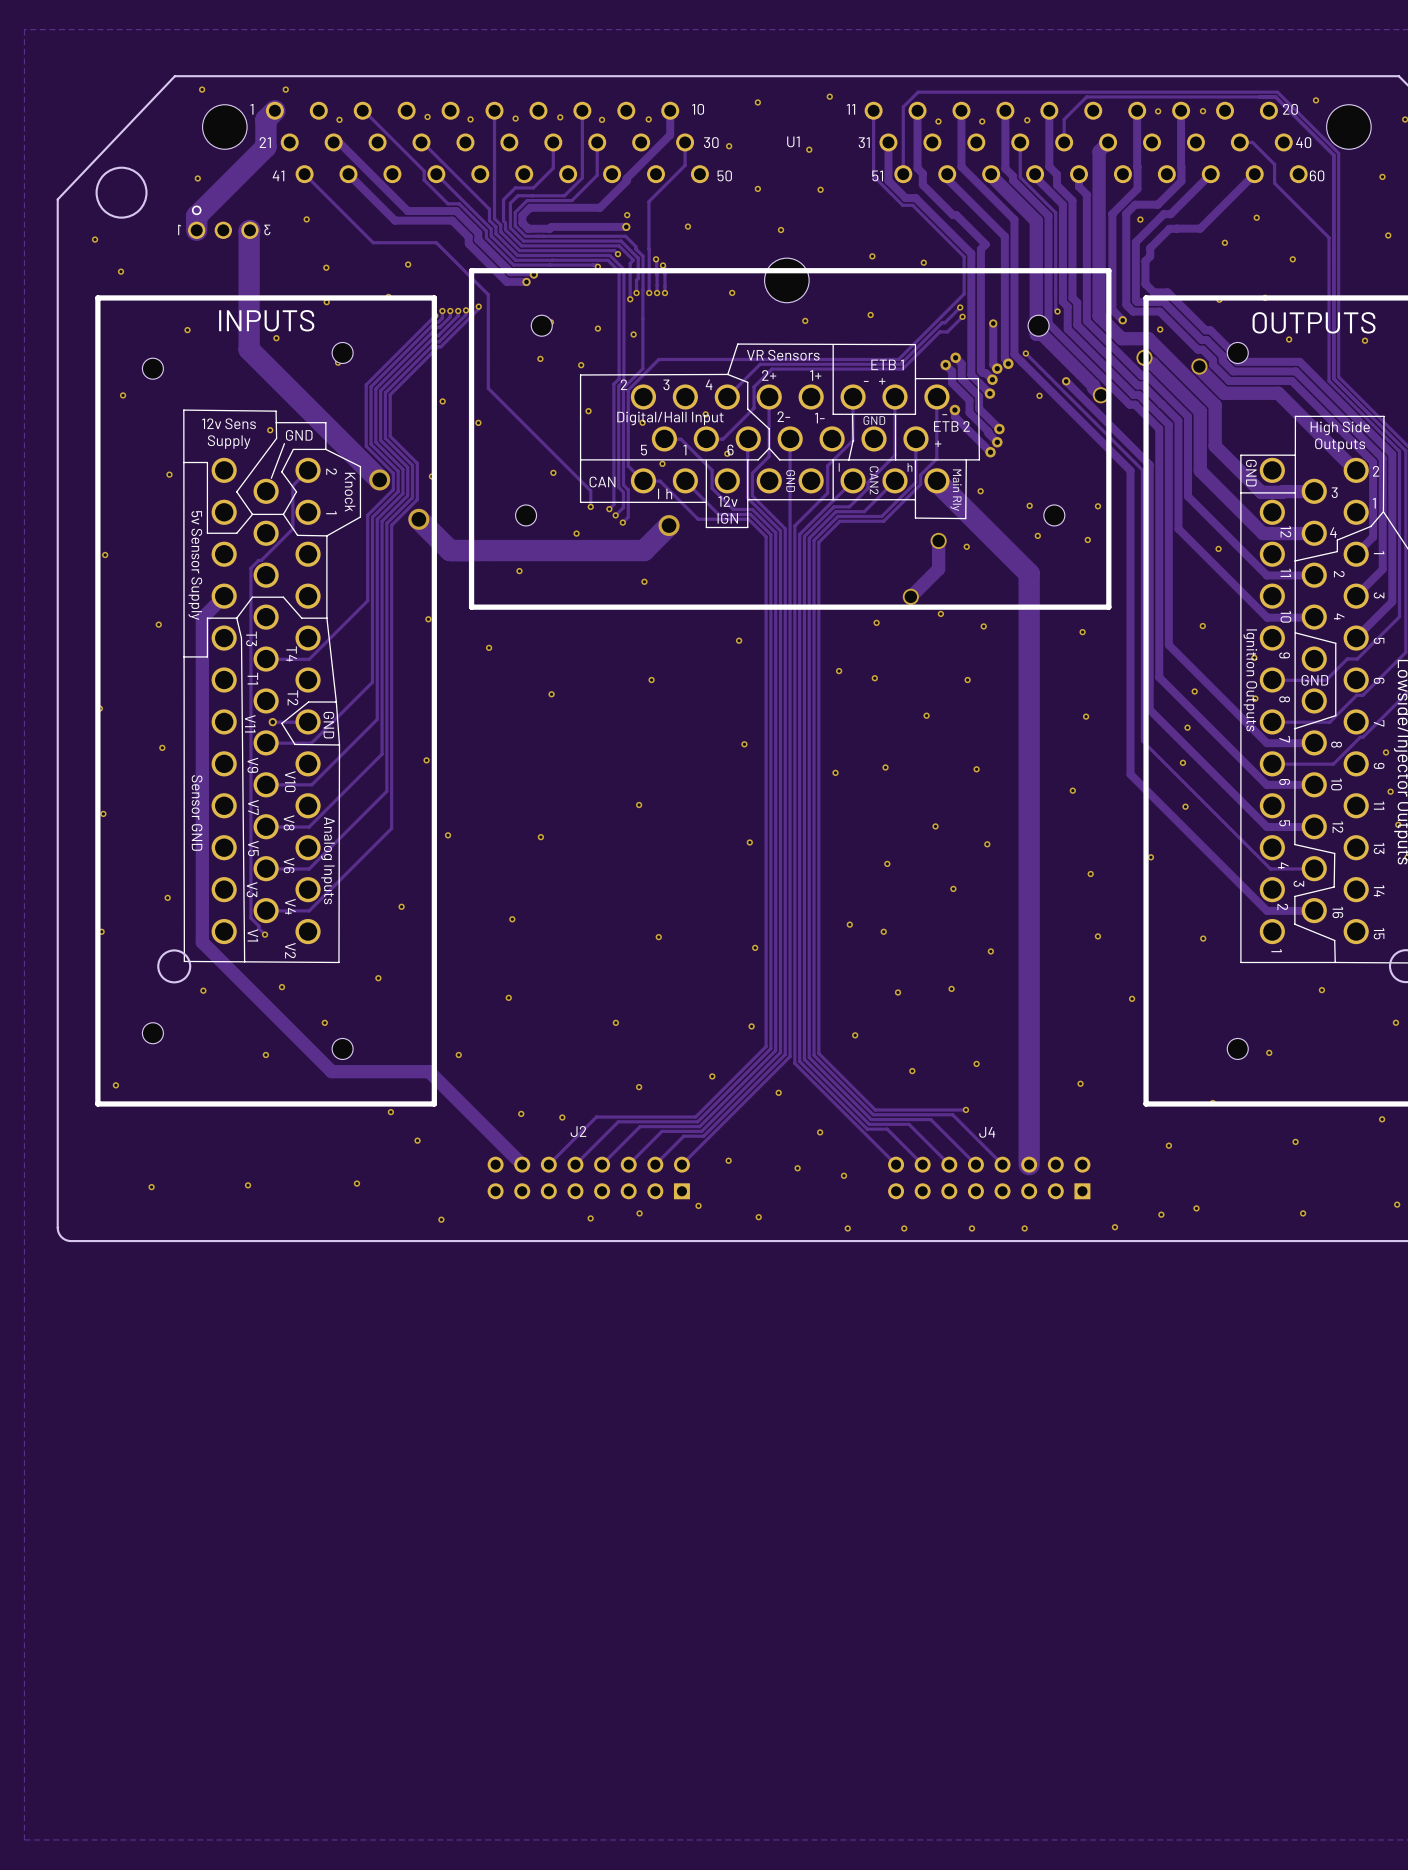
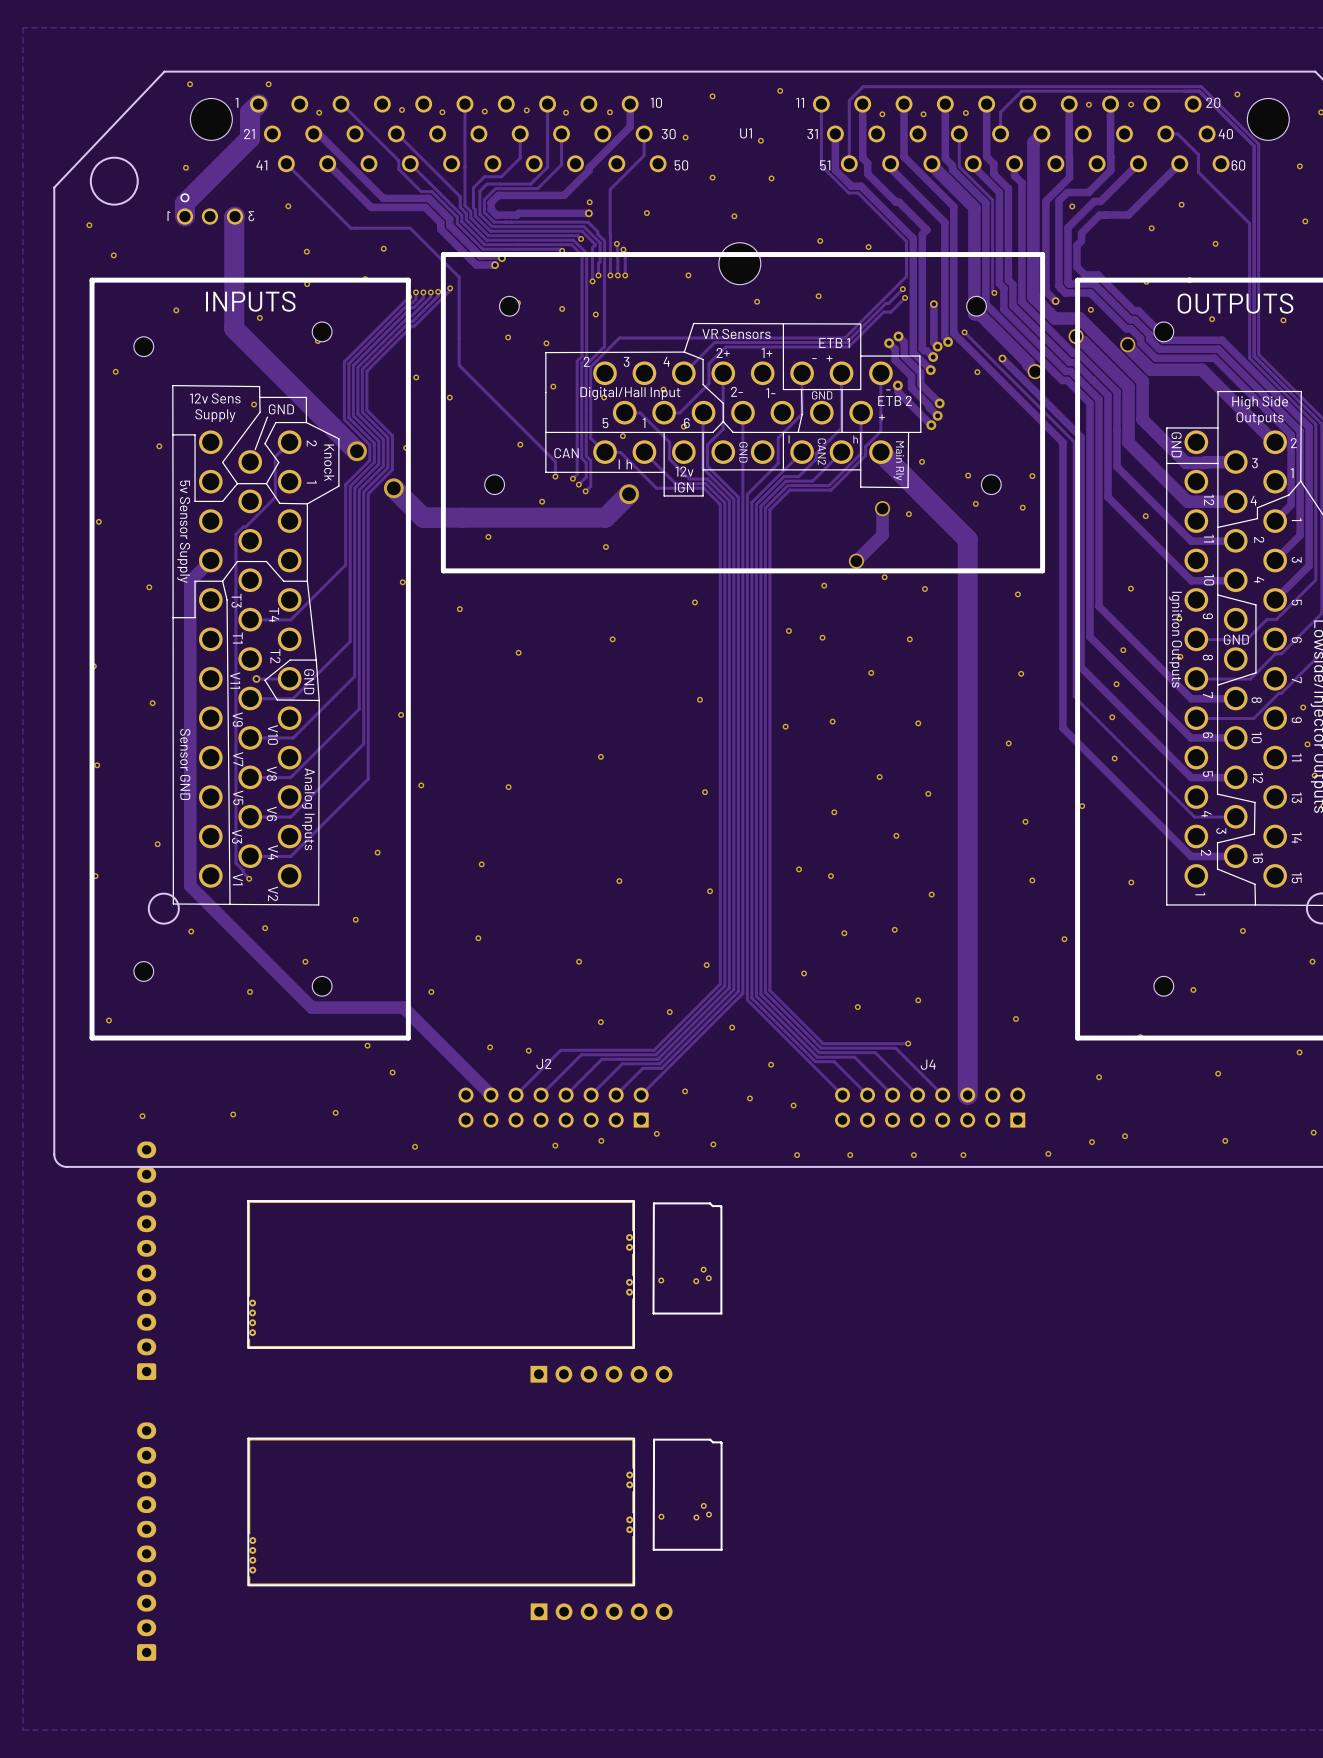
part: none -> (687, 1258)
part: none -> (146, 1260)
part: none -> (441, 1274)
part: none -> (601, 1374)
part: none -> (687, 1494)
part: none -> (441, 1511)
part: none -> (146, 1541)
part: none -> (601, 1611)

